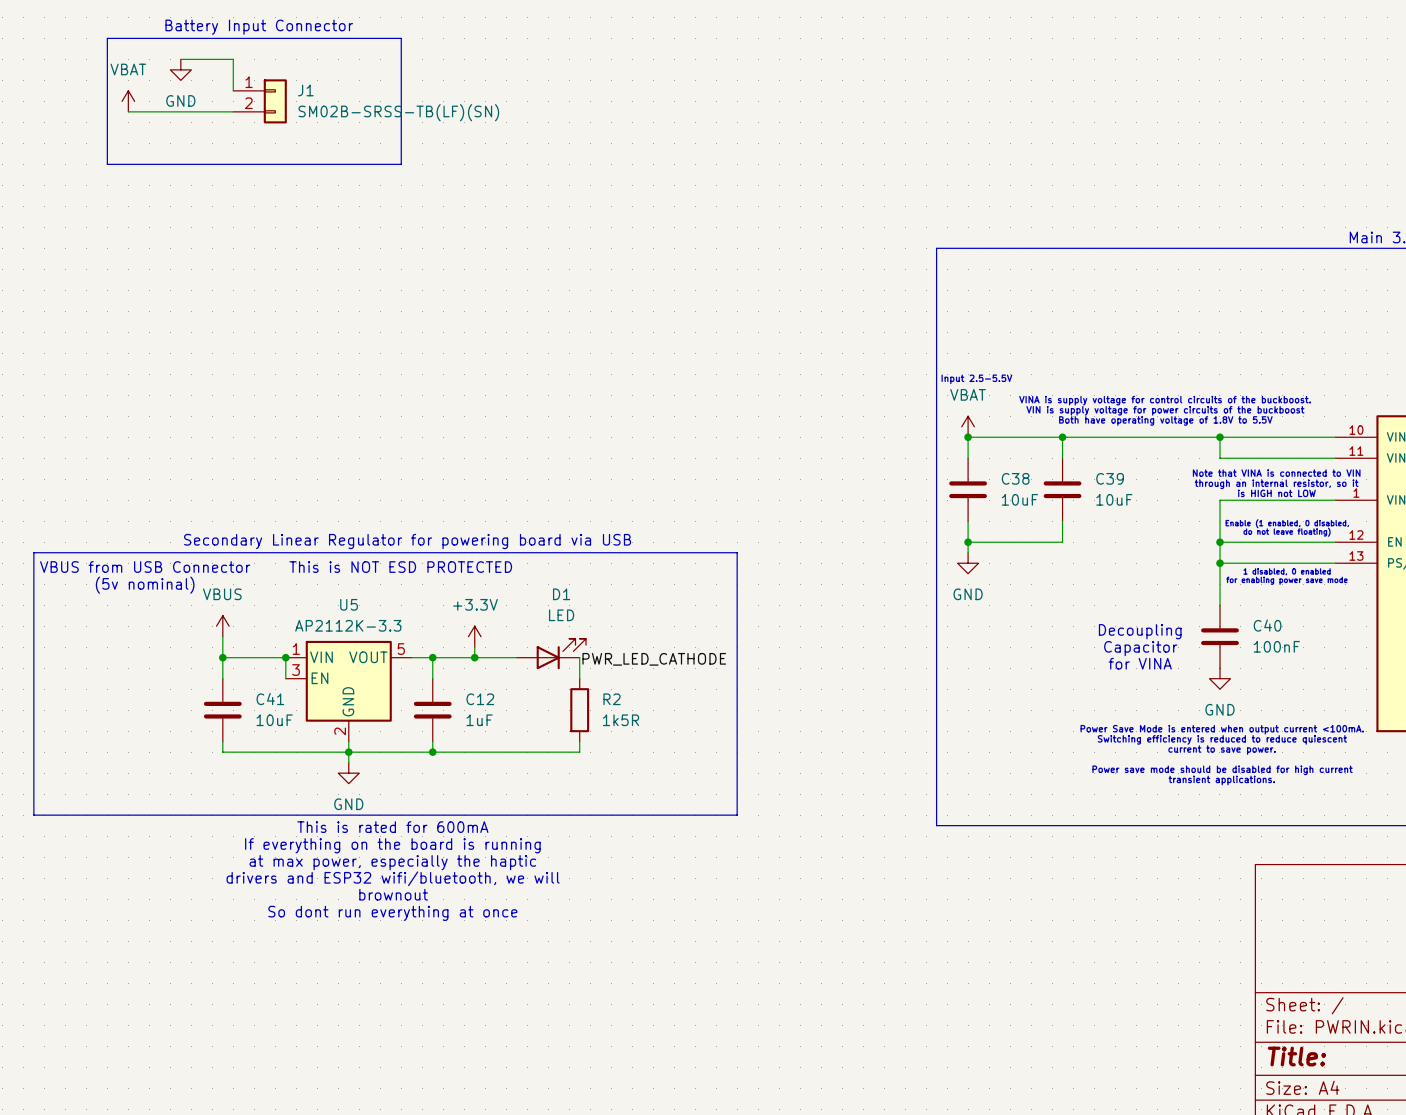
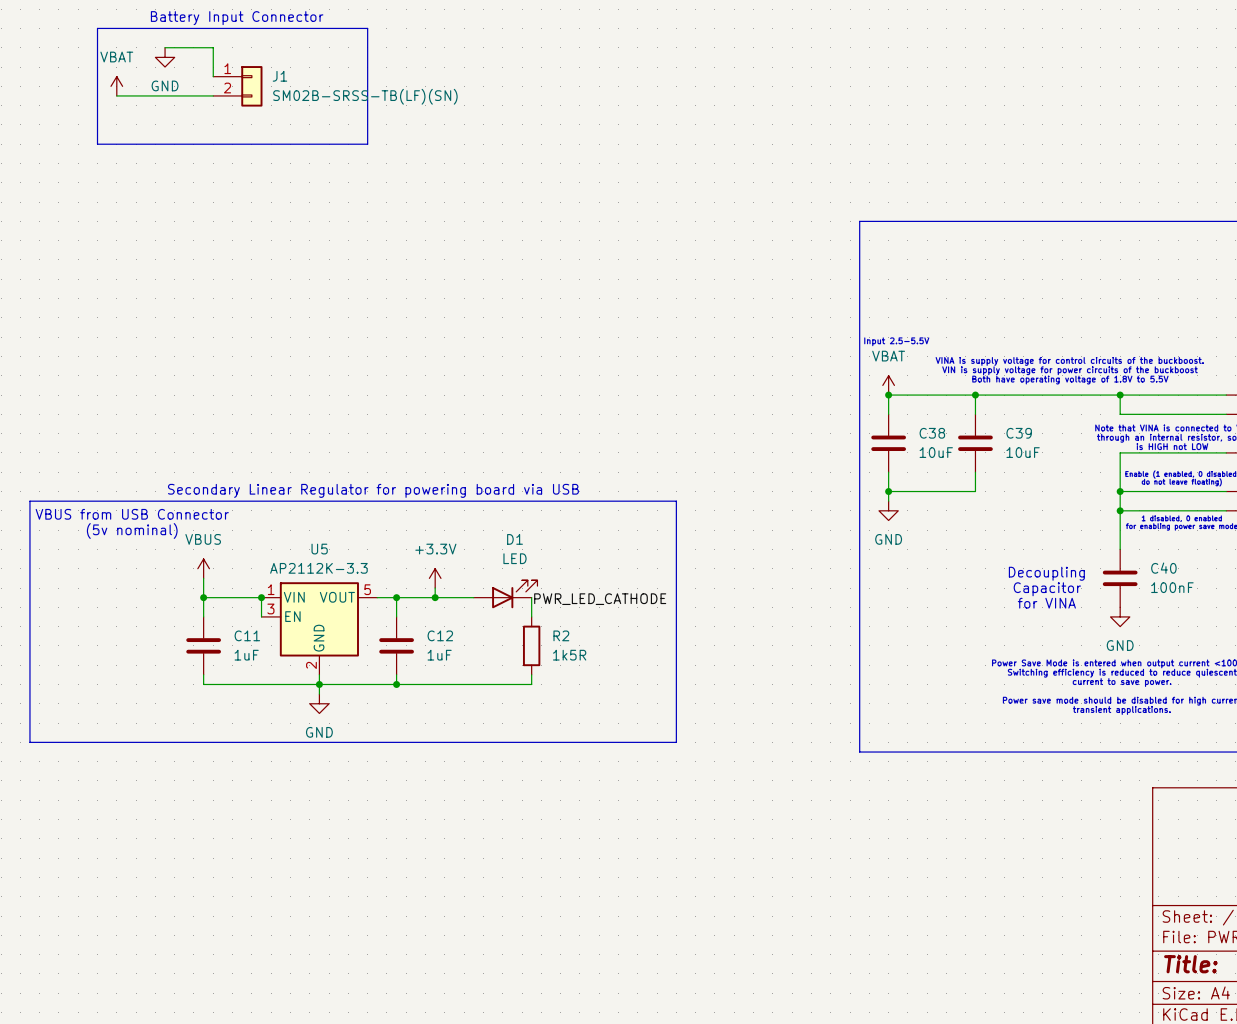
text: This is NOT ESD PROTECTED (400, 567) -> none
C41 name: C41 (270, 699) -> C11 (247, 635)
C41 value: 10uF (274, 720) -> 1uF (246, 655)
text: This is rated for 600mA (392, 827) -> none
text: If everything on the board is running (392, 845) -> none
text: at max power, especially the haptic (392, 862) -> none
text: drivers and ESP32 wifi/bluetooth, we will (393, 878) -> none
text: brownout (393, 894) -> none
text: So dont run everything at once (392, 913) -> none

